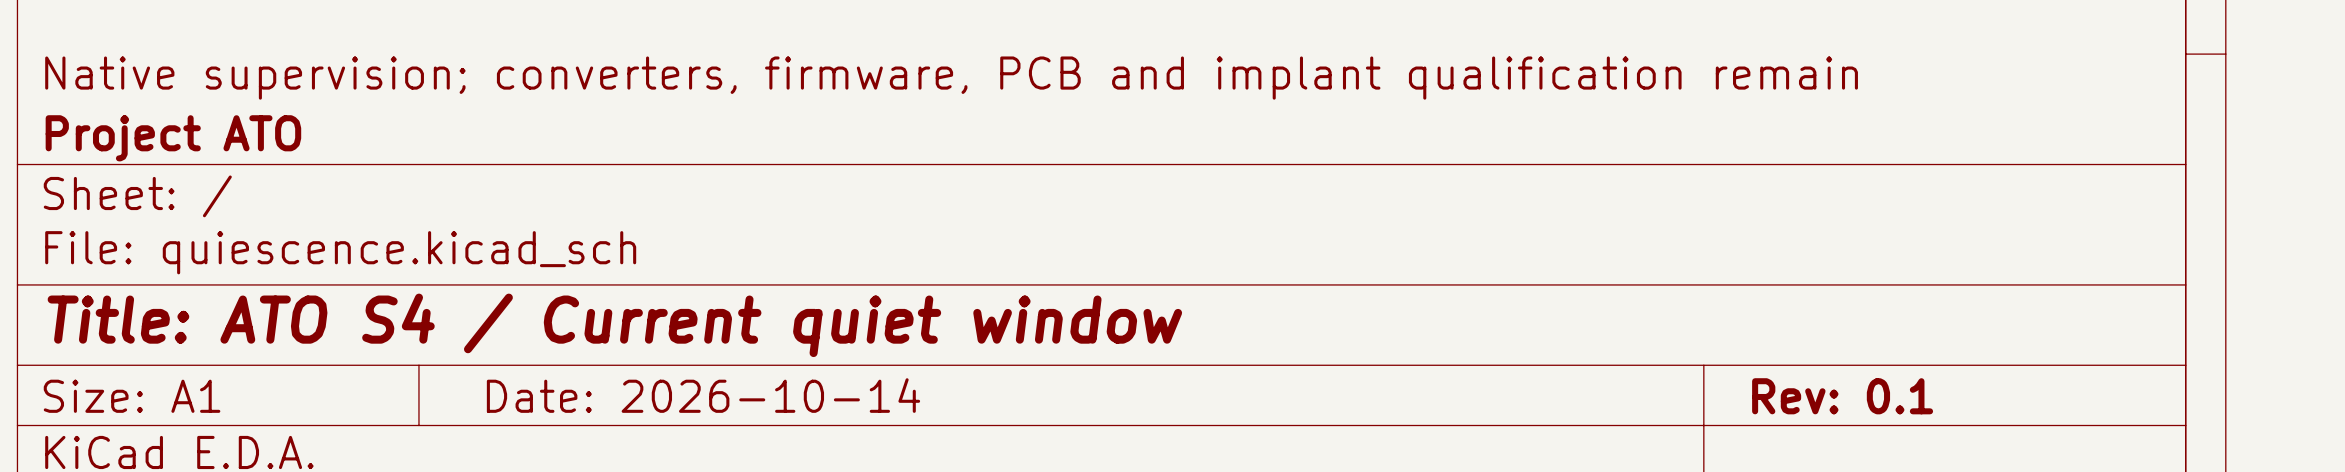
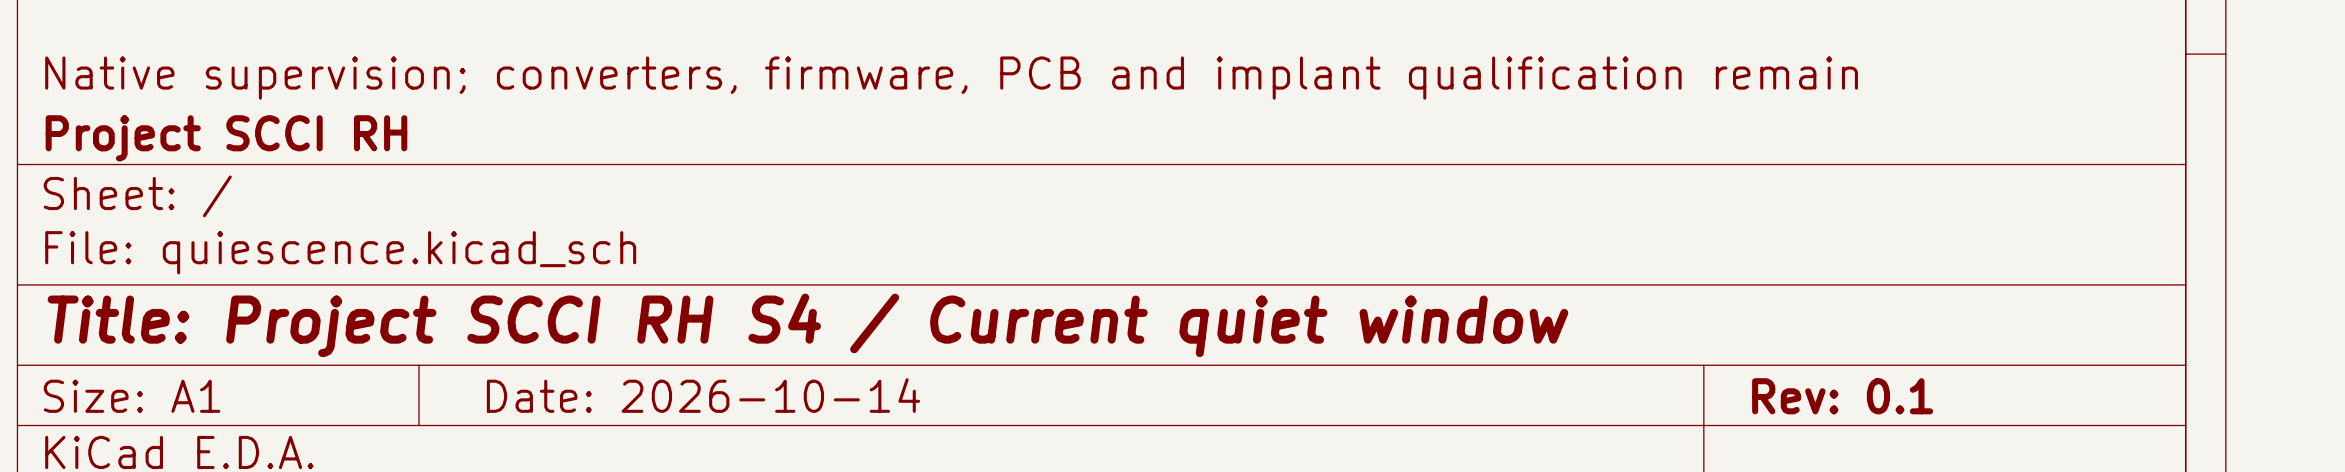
title block: Project ATO (173, 138) -> Project SCCI RH (226, 138)
title block: Title: ATO S4 / Current quiet window (614, 325) -> Title: Project SCCI RH S4 / Current quiet window (807, 325)

